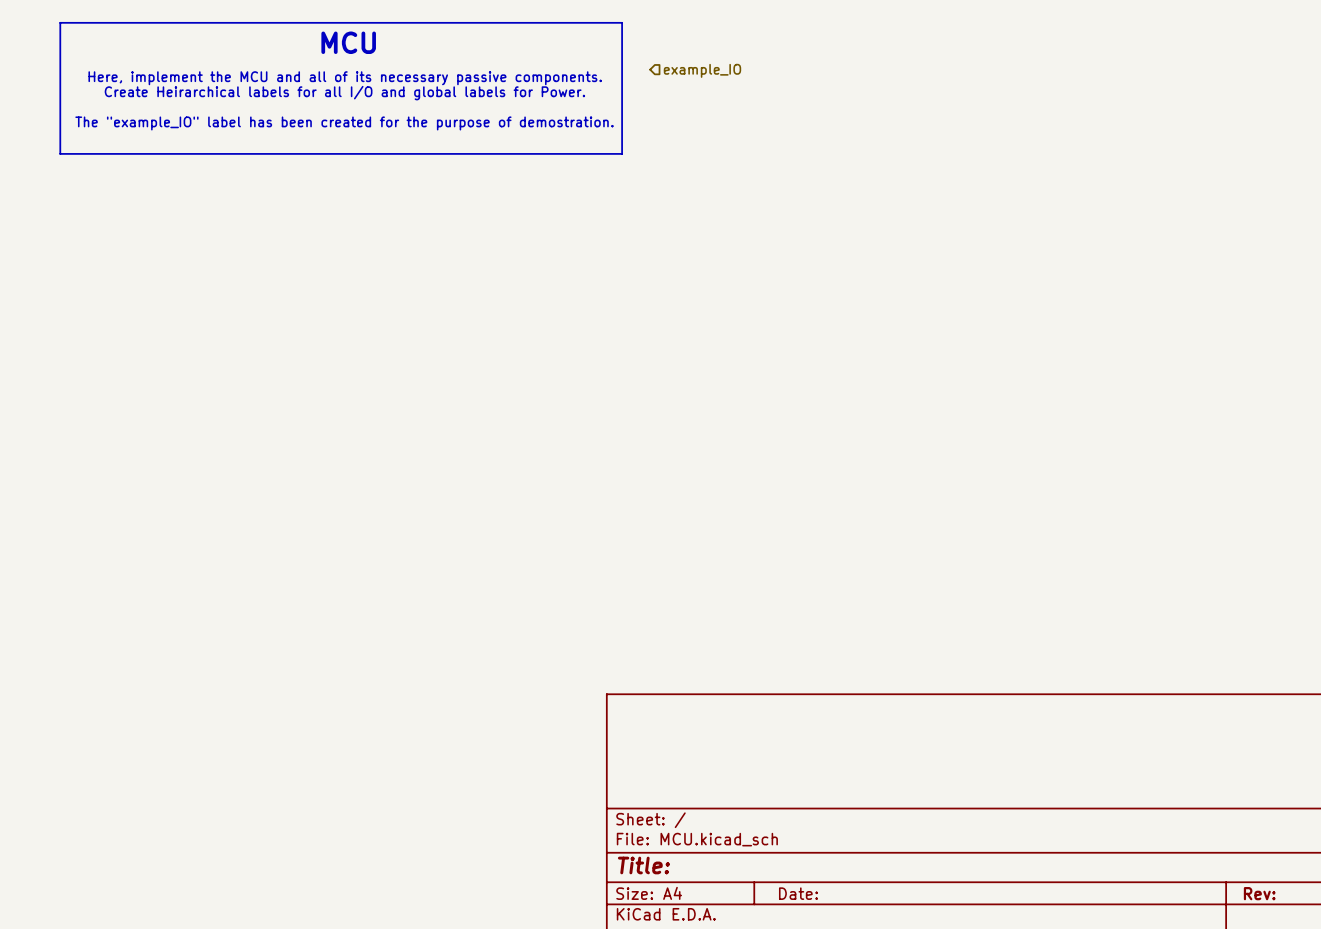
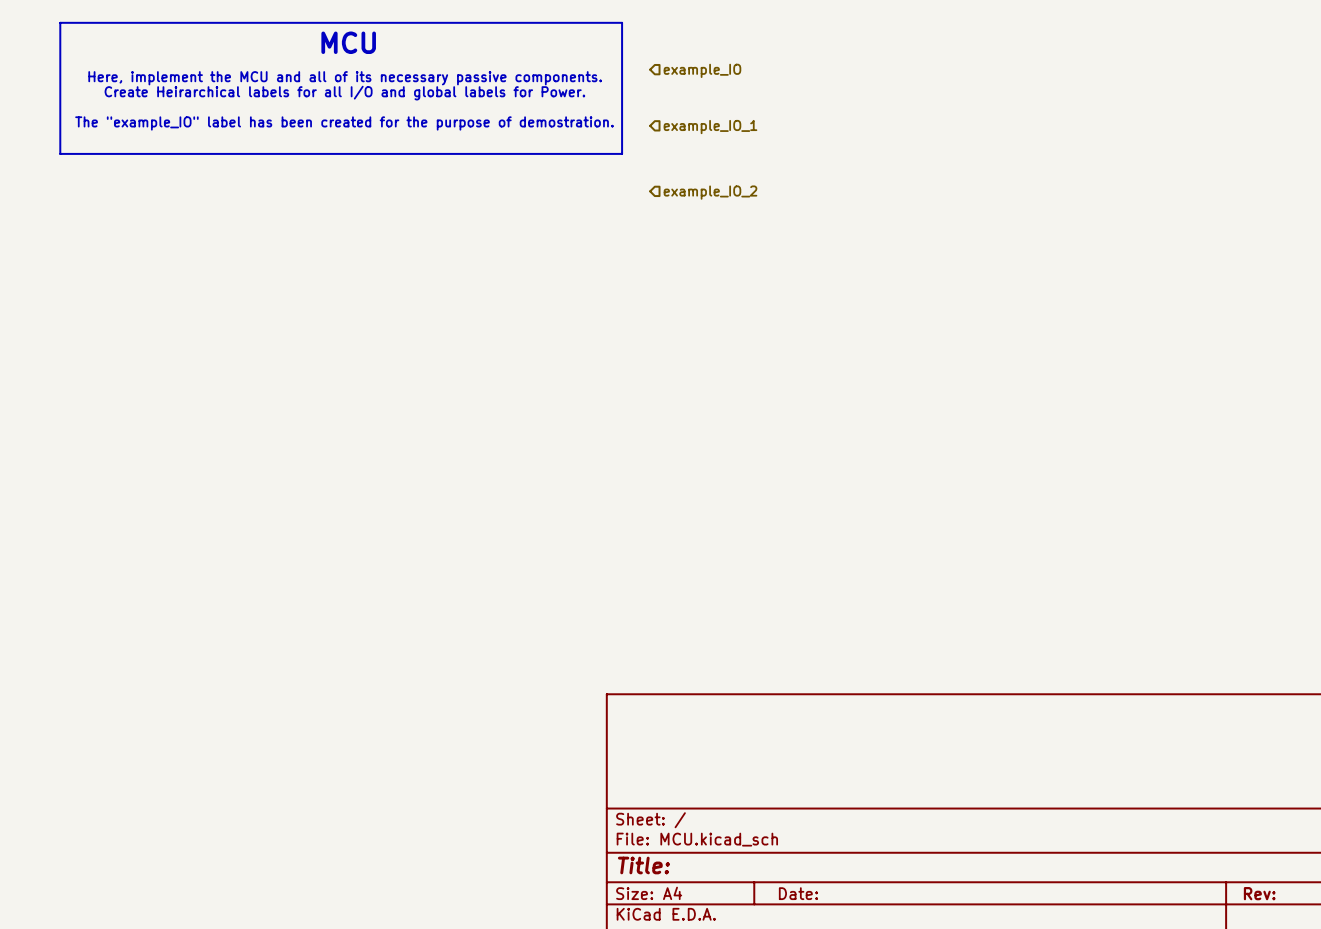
hierarchical label: none -> example_IO_1 (710, 127)
hierarchical label: none -> example_IO_2 (710, 192)

